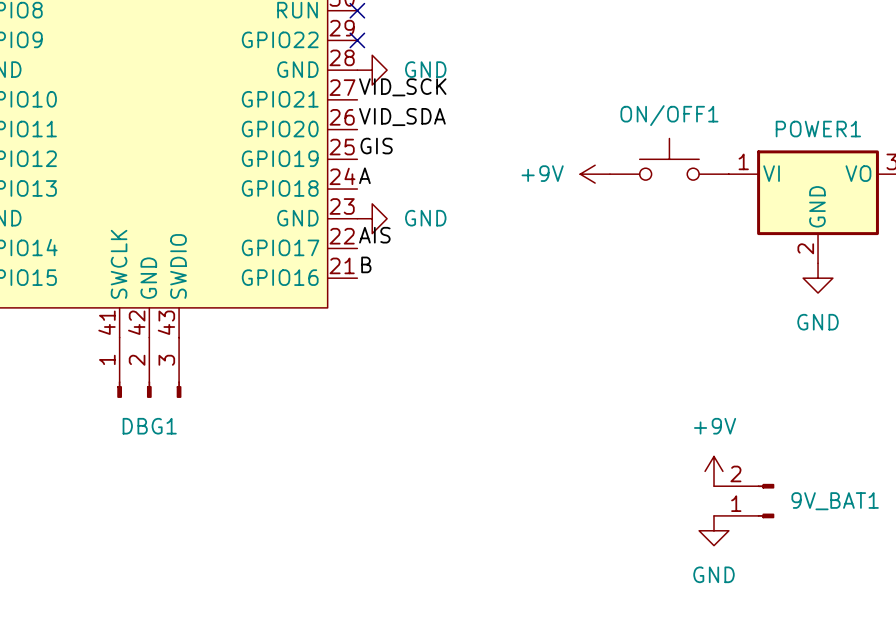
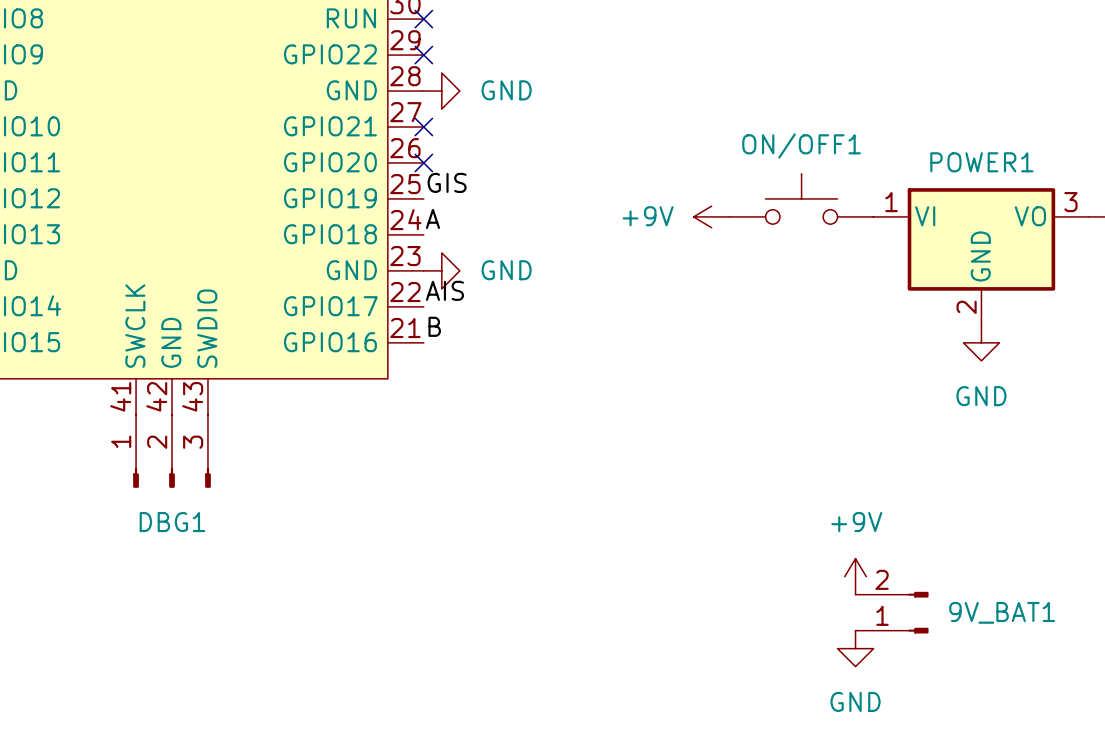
label: VID_SCK (402, 87) -> none
no-connect mark: none -> (423, 127)
label: VID_SDA (402, 117) -> none
no-connect mark: none -> (423, 162)

